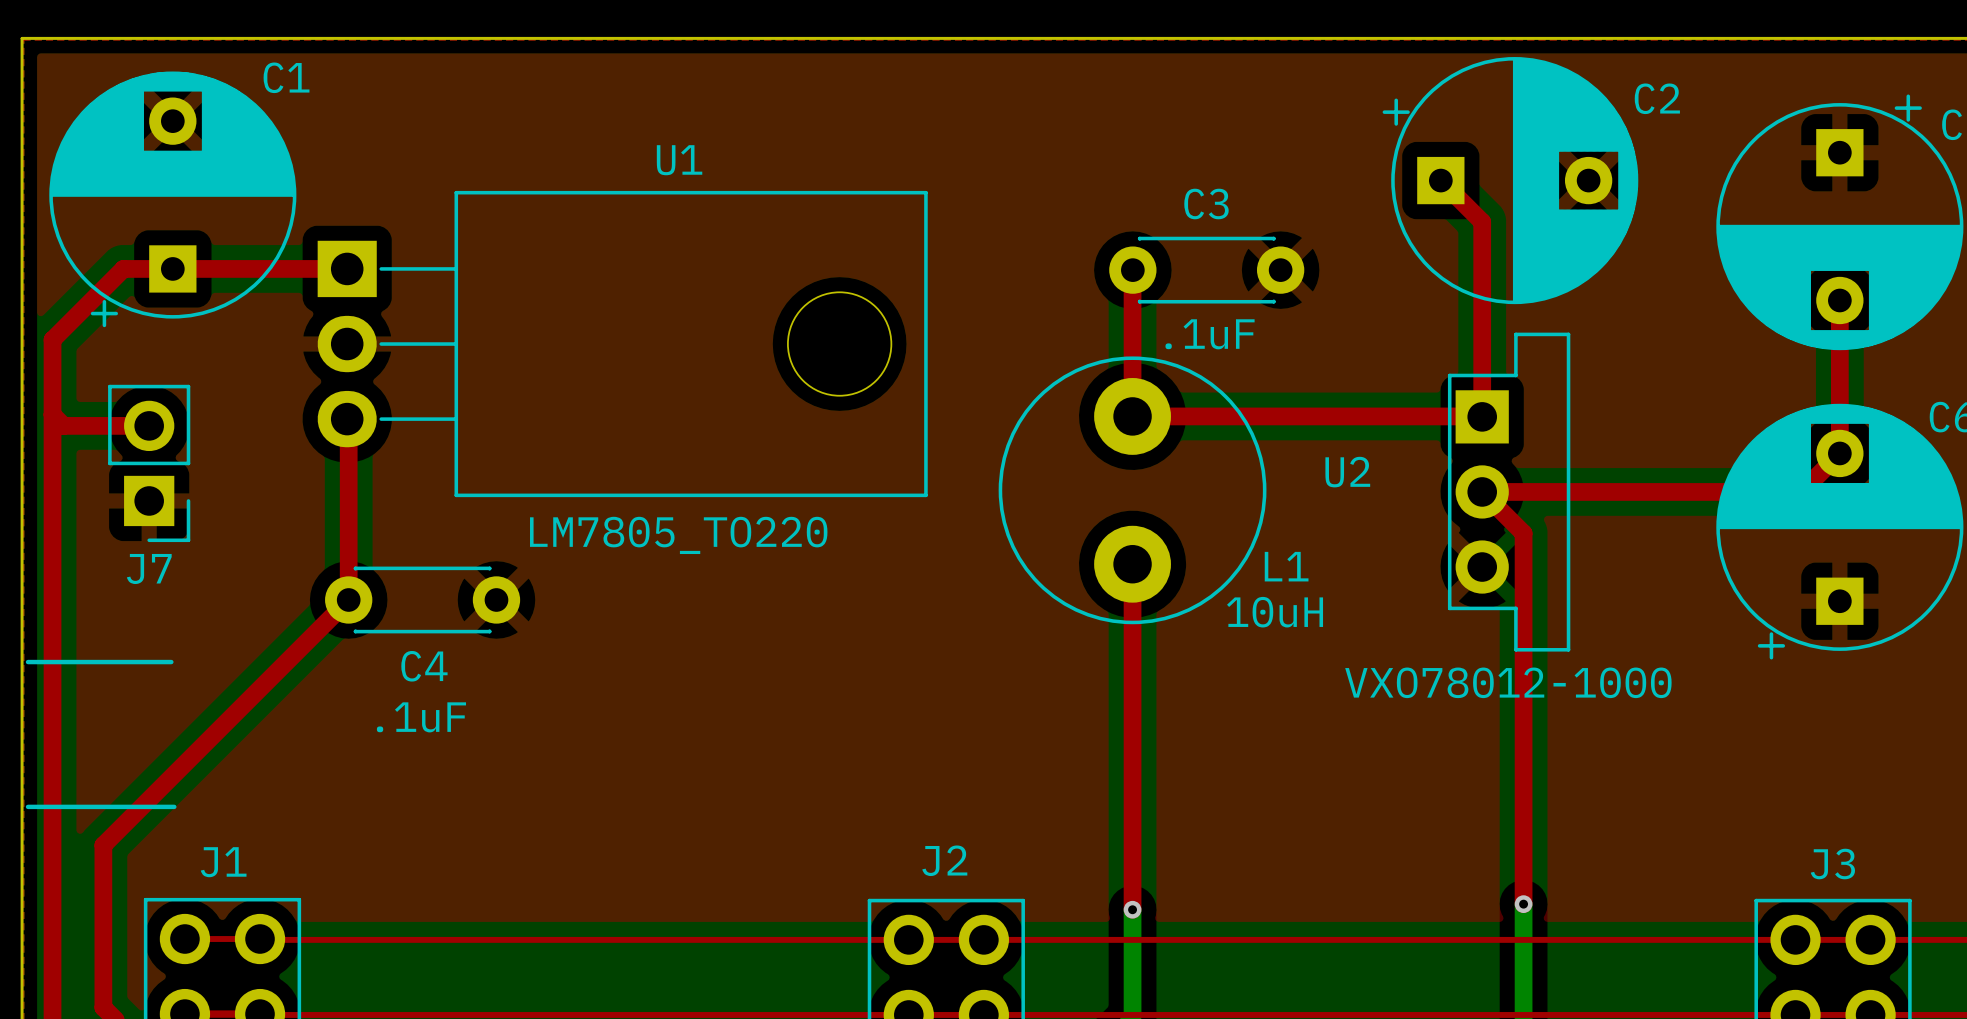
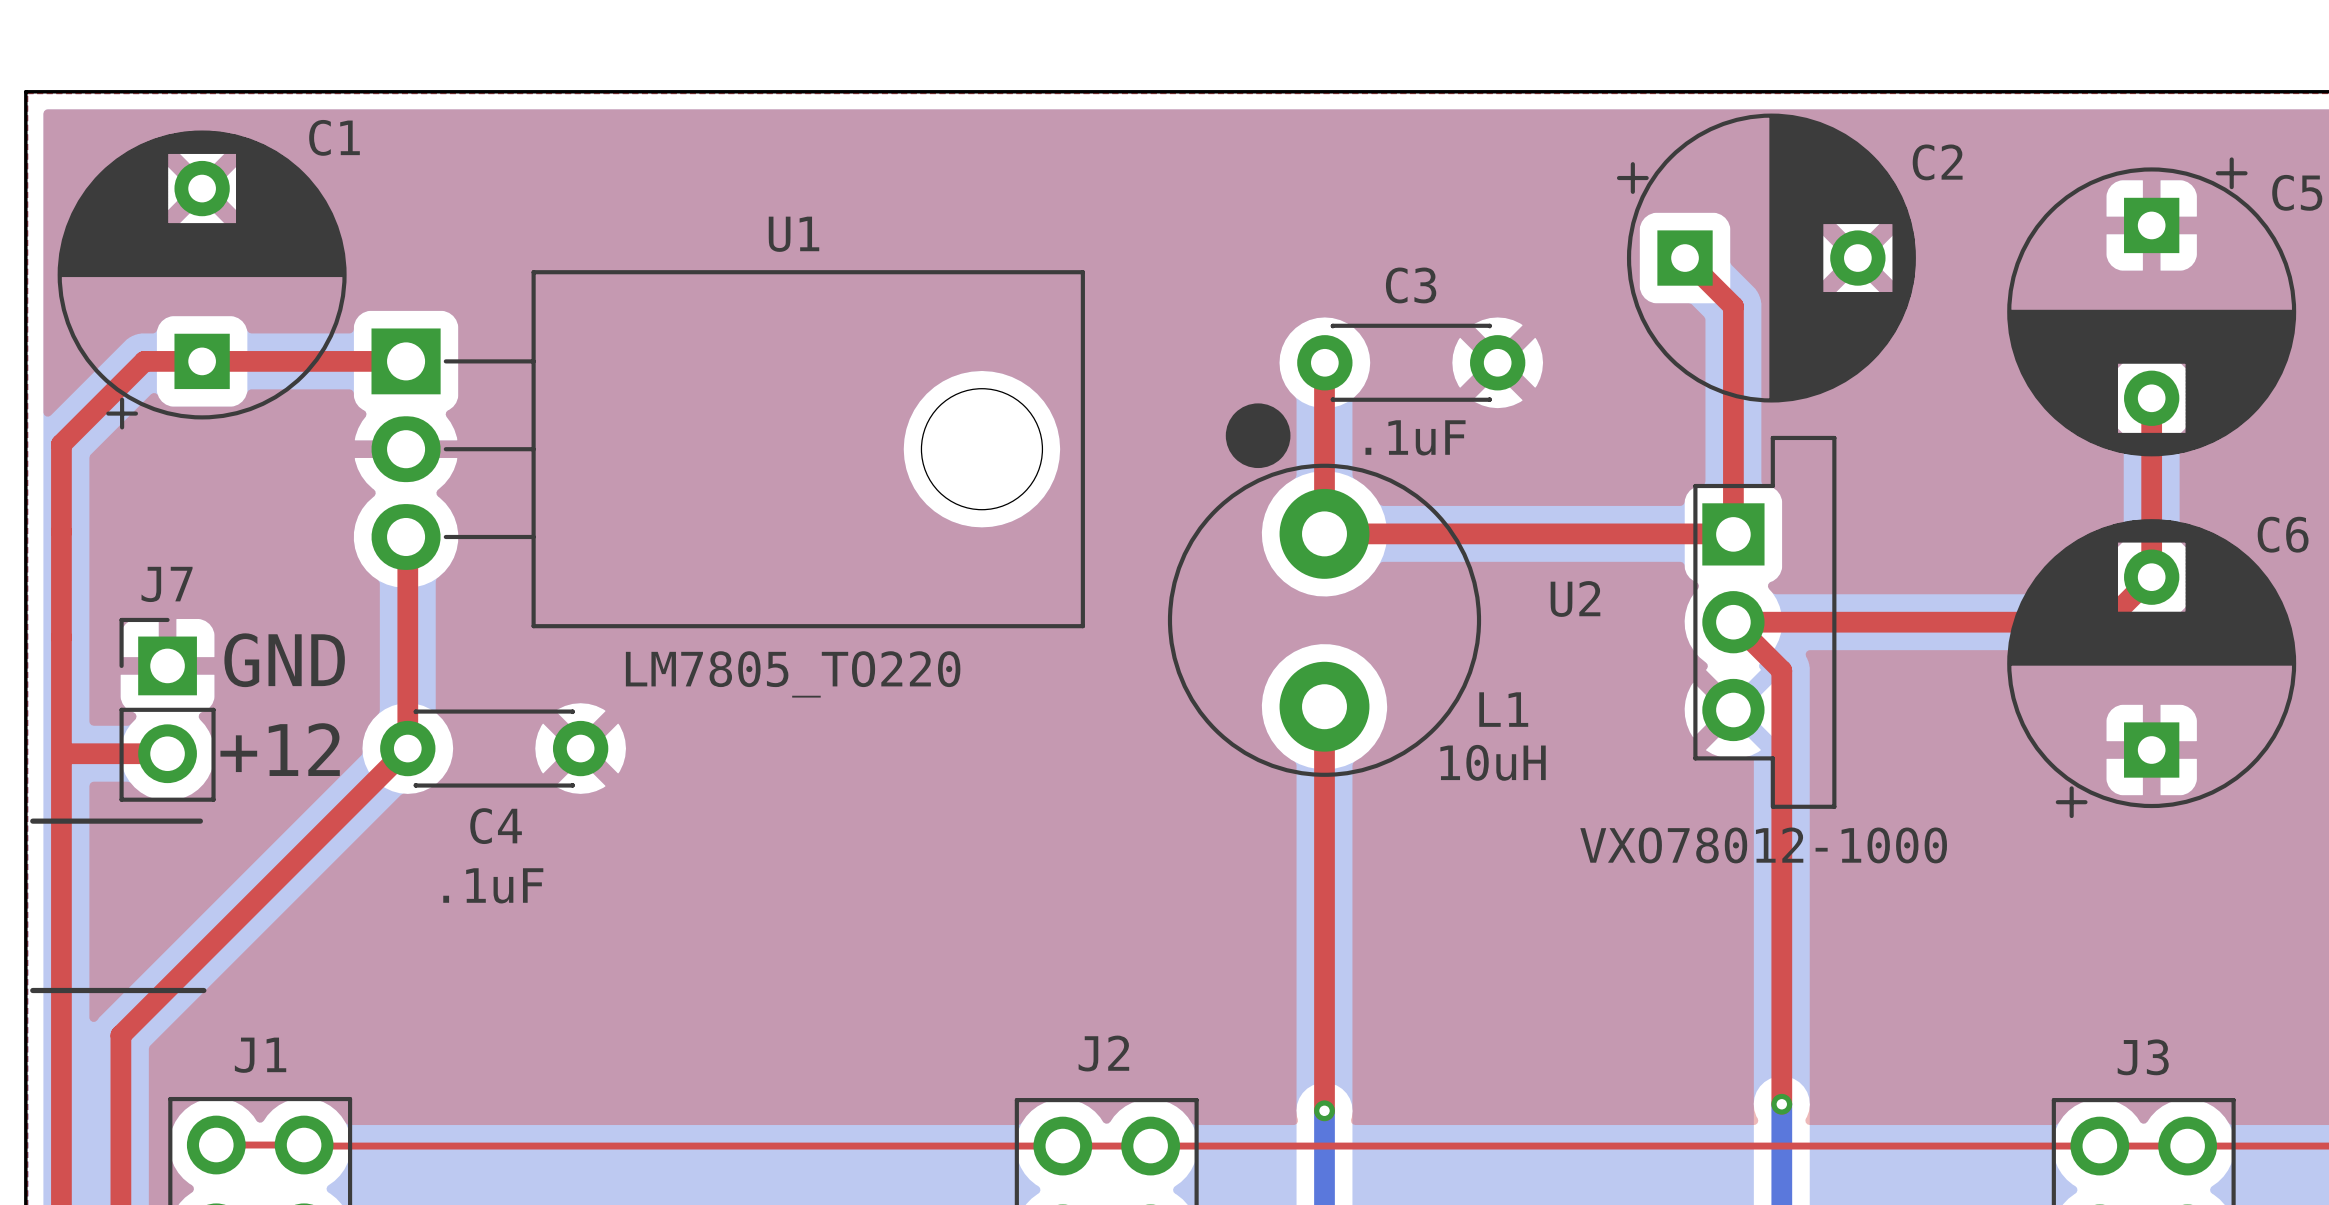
drawing: none -> [1225, 403, 1291, 469]
top track: (52, 414) (63, 425) (149, 425) -> none
J7 rotation: 0° (149, 463) -> 180° (167, 709)
J7 position: (149, 463) -> (167, 709)
text: none -> GND (284, 660)
text: none -> +12 (280, 749)
top track: none -> (62, 753) (167, 753)

